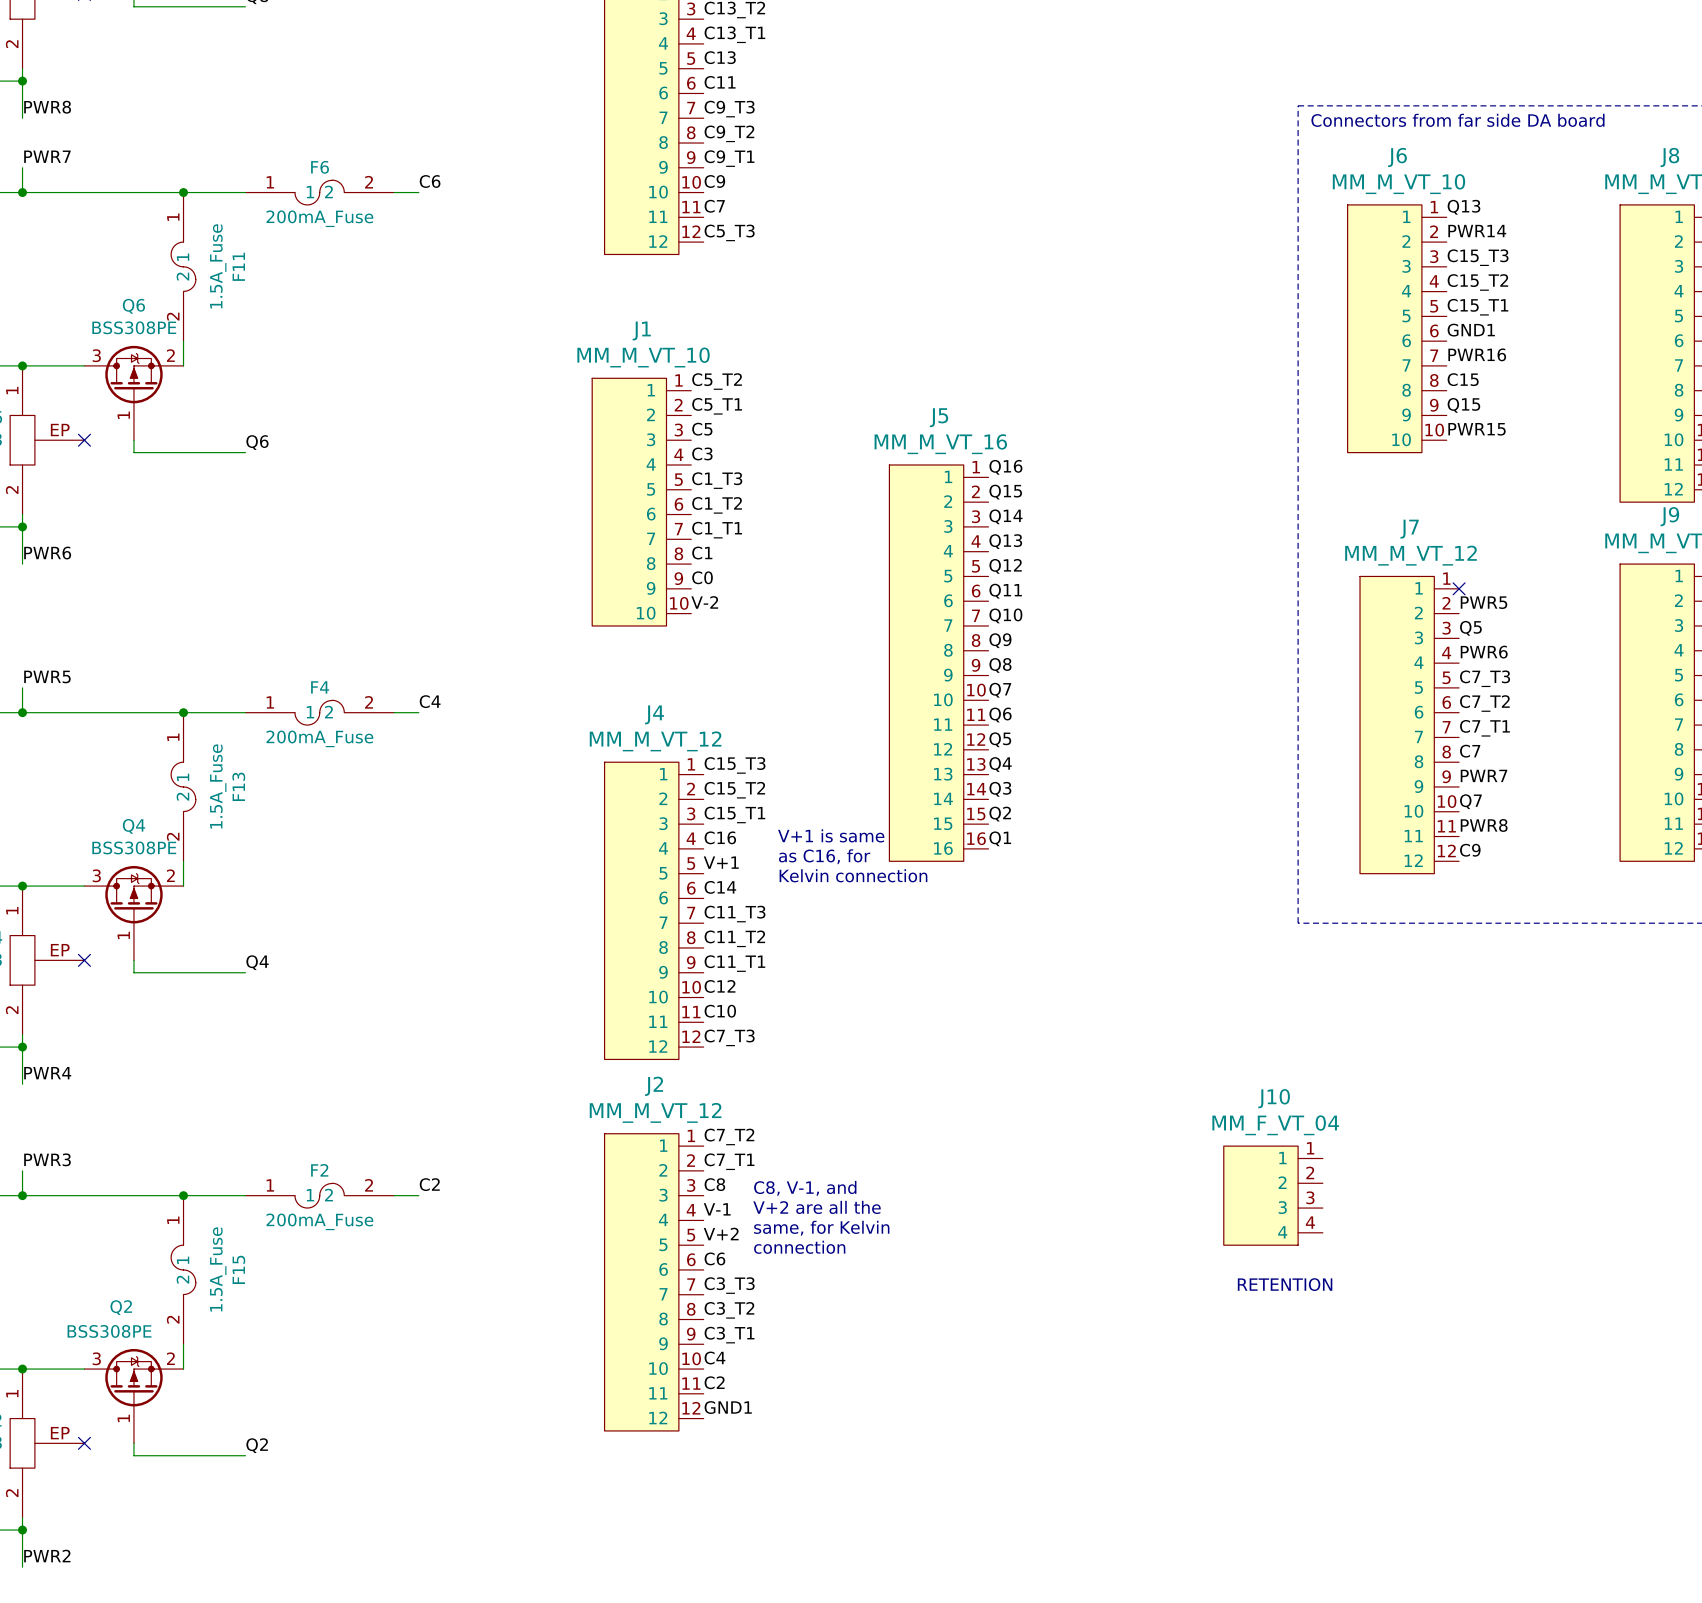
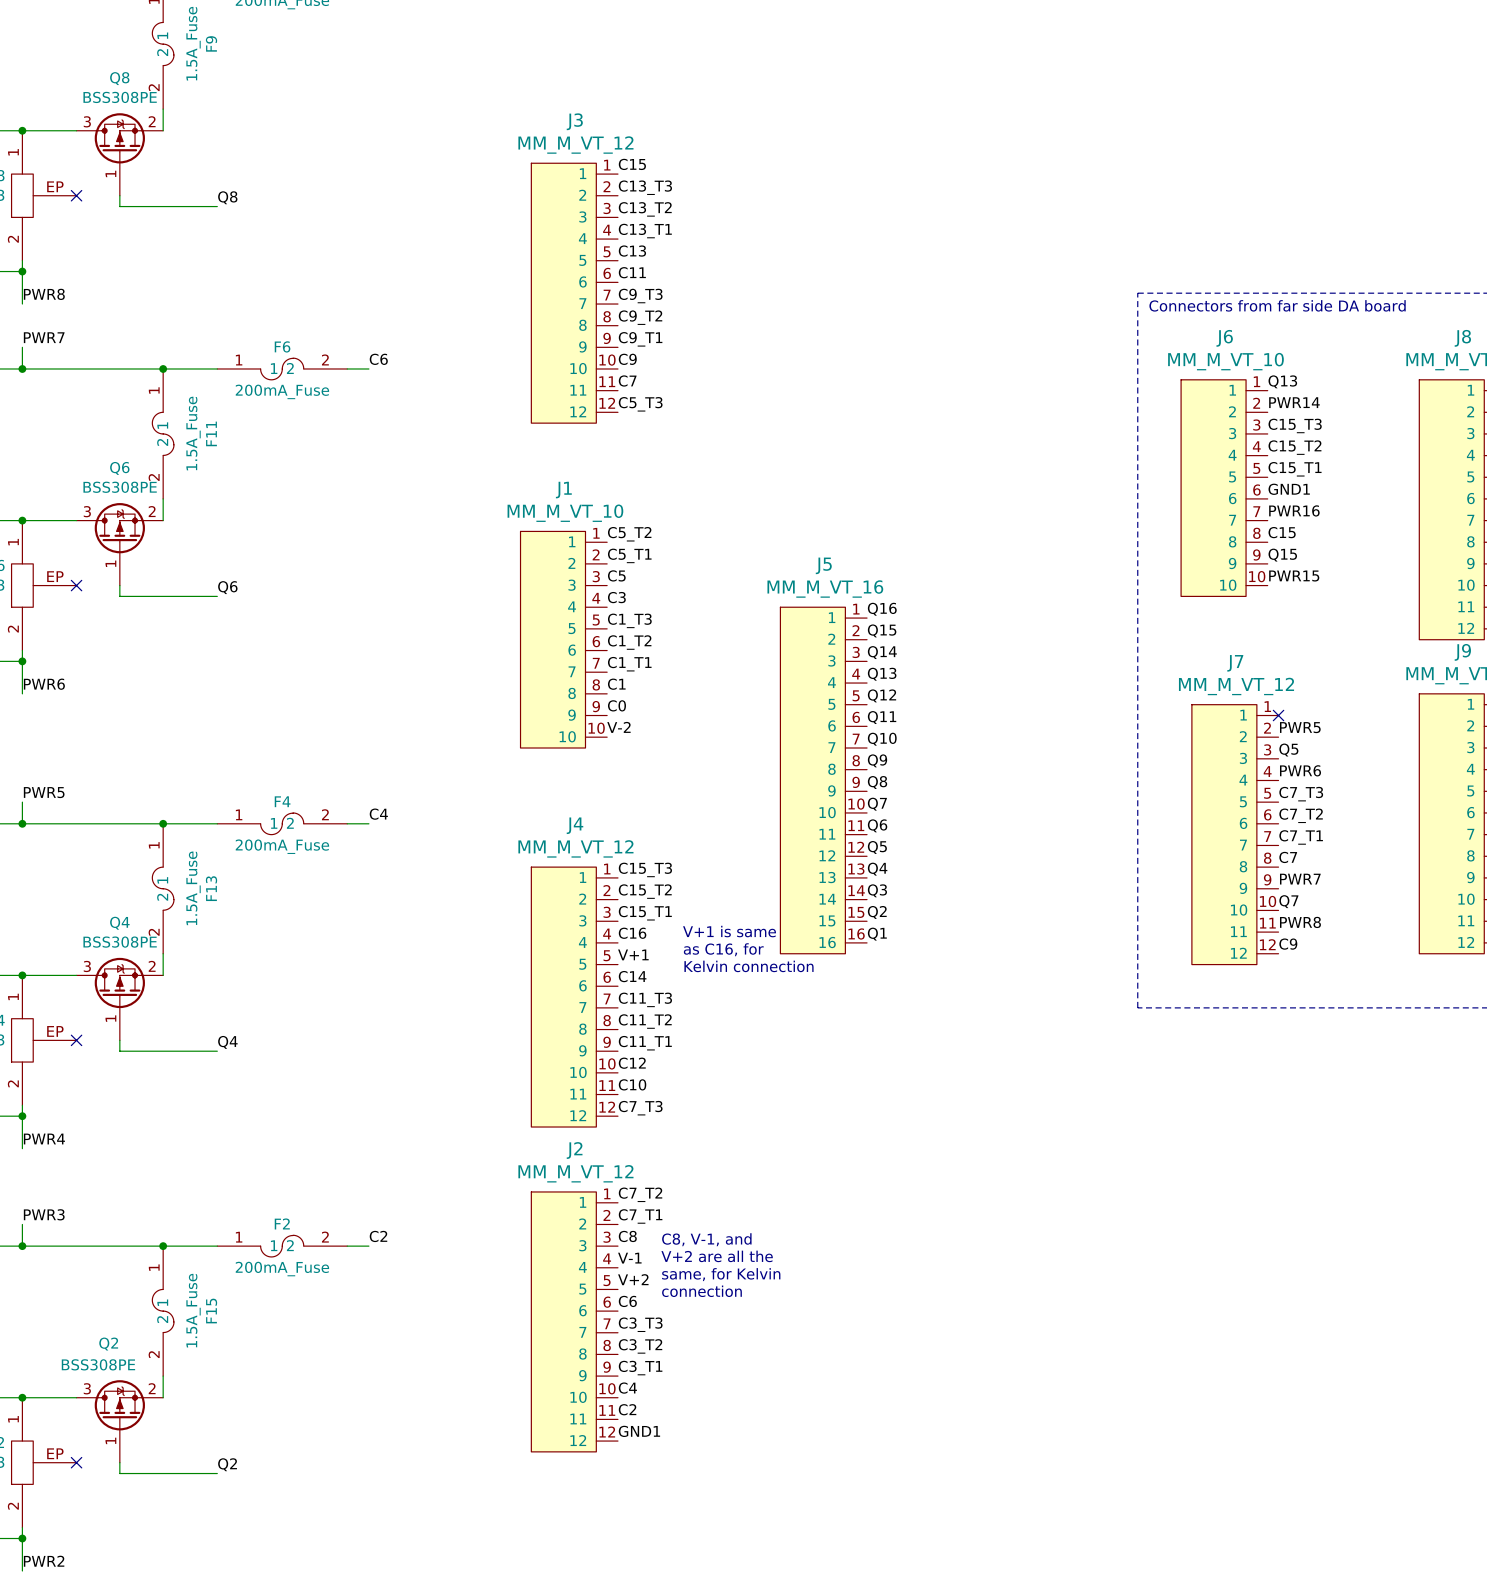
J10: MM_F_VT_04 (1273, 1195) -> none
text: RETENTION (1285, 1284) -> none

